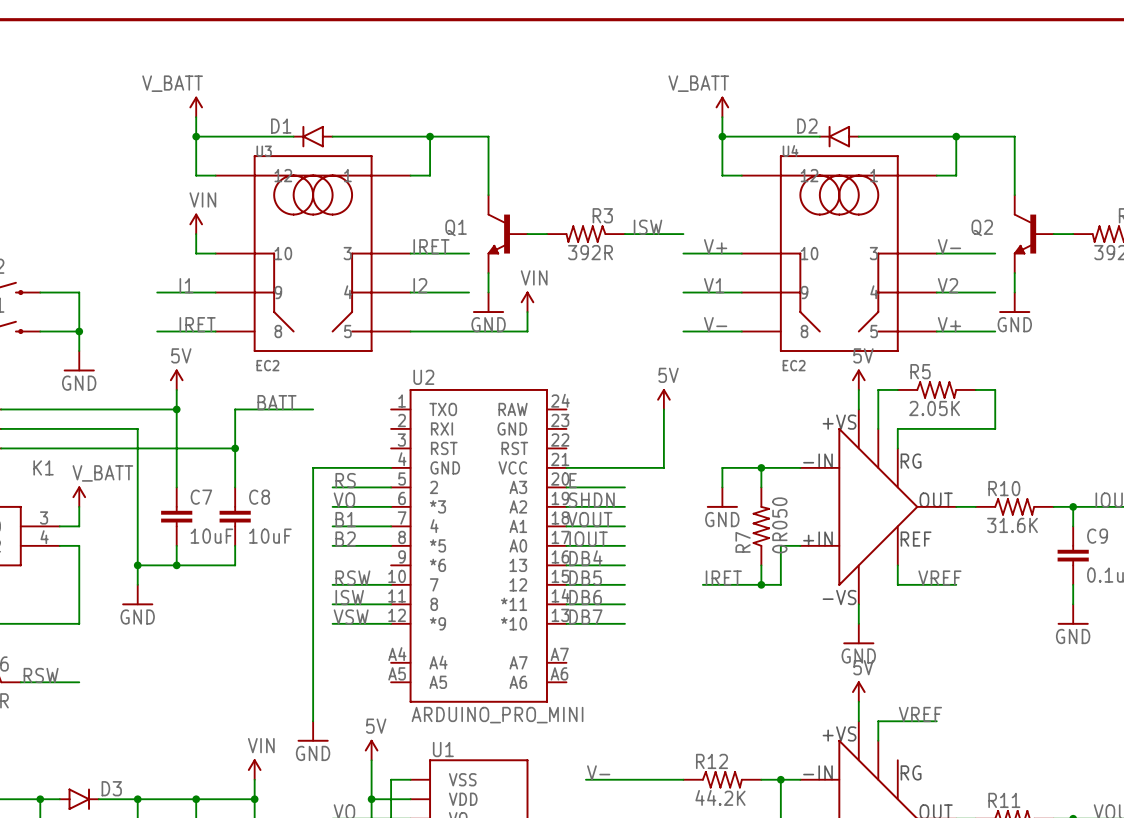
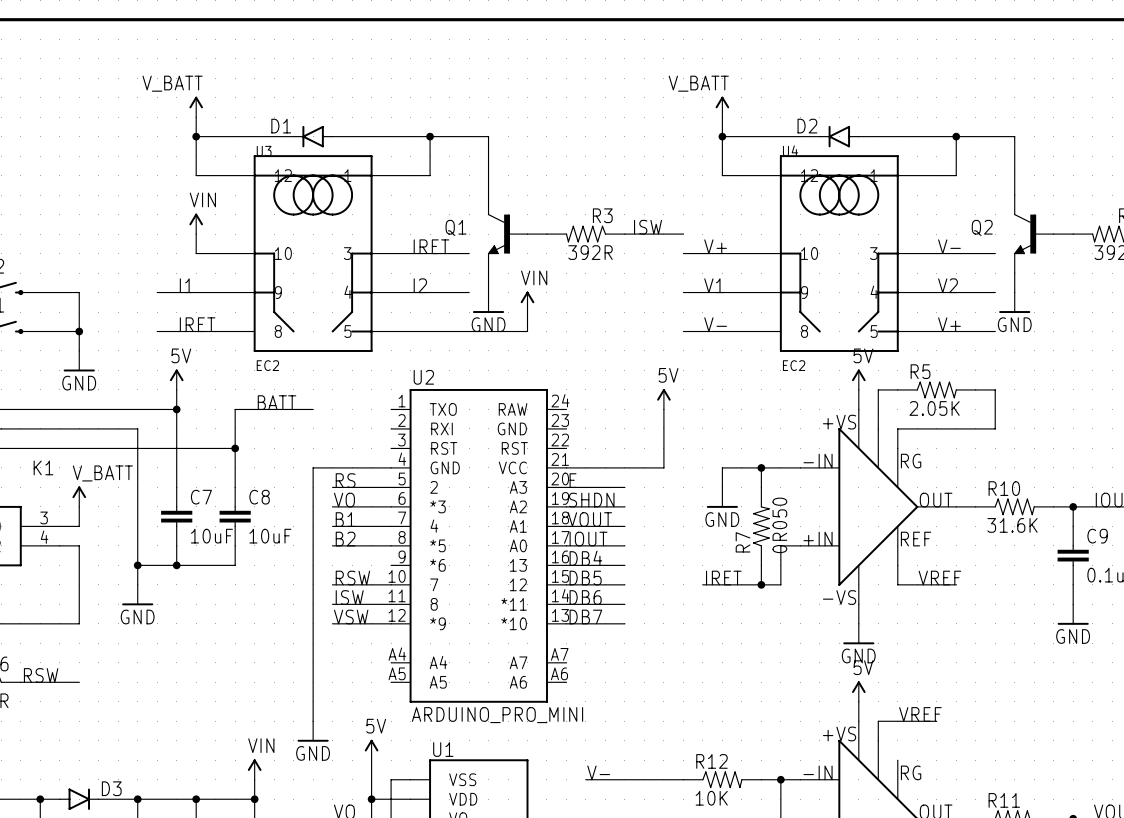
R12 value: 44.2K (720, 797) -> 10K (711, 798)

